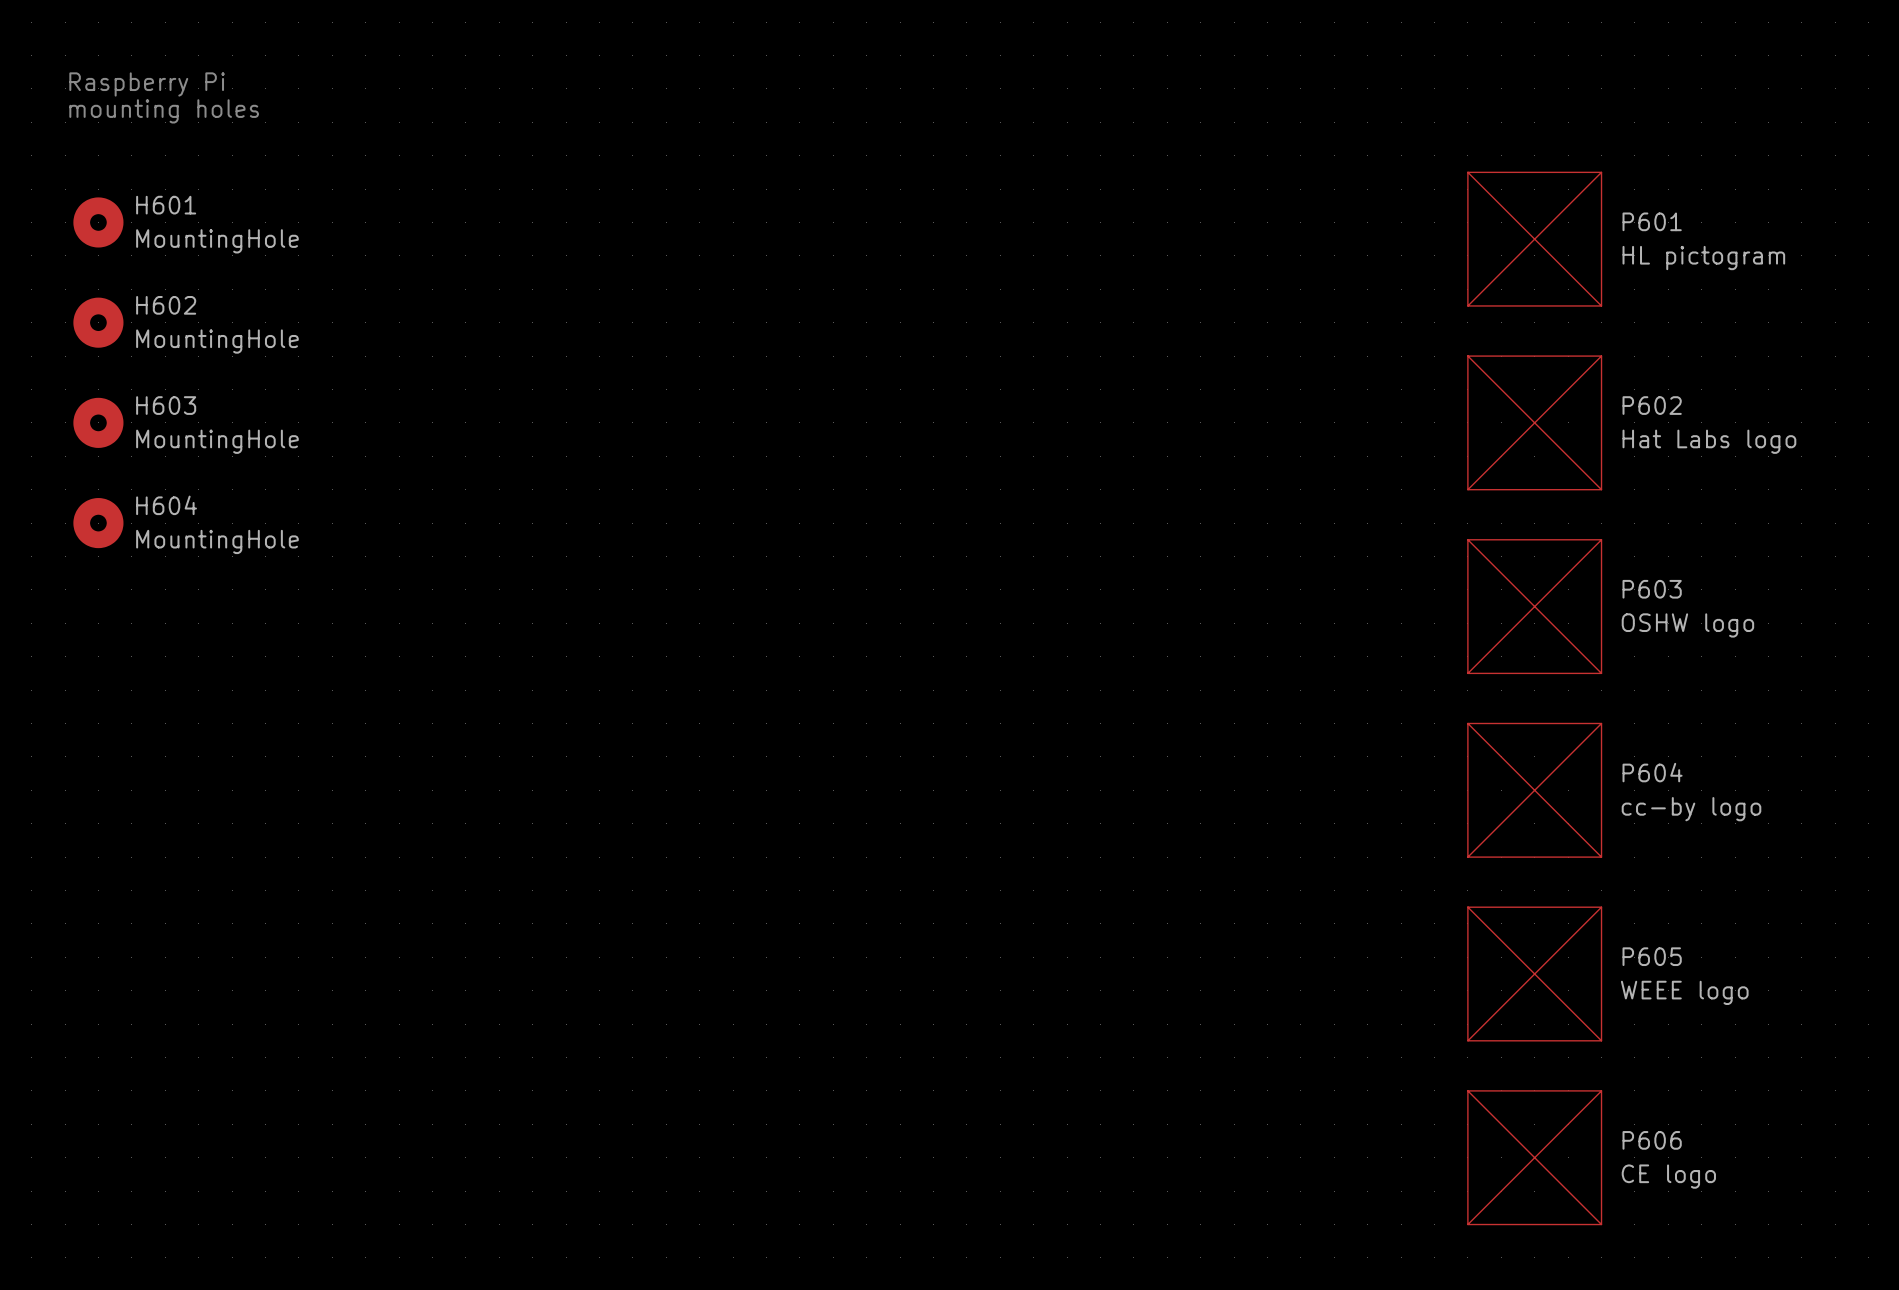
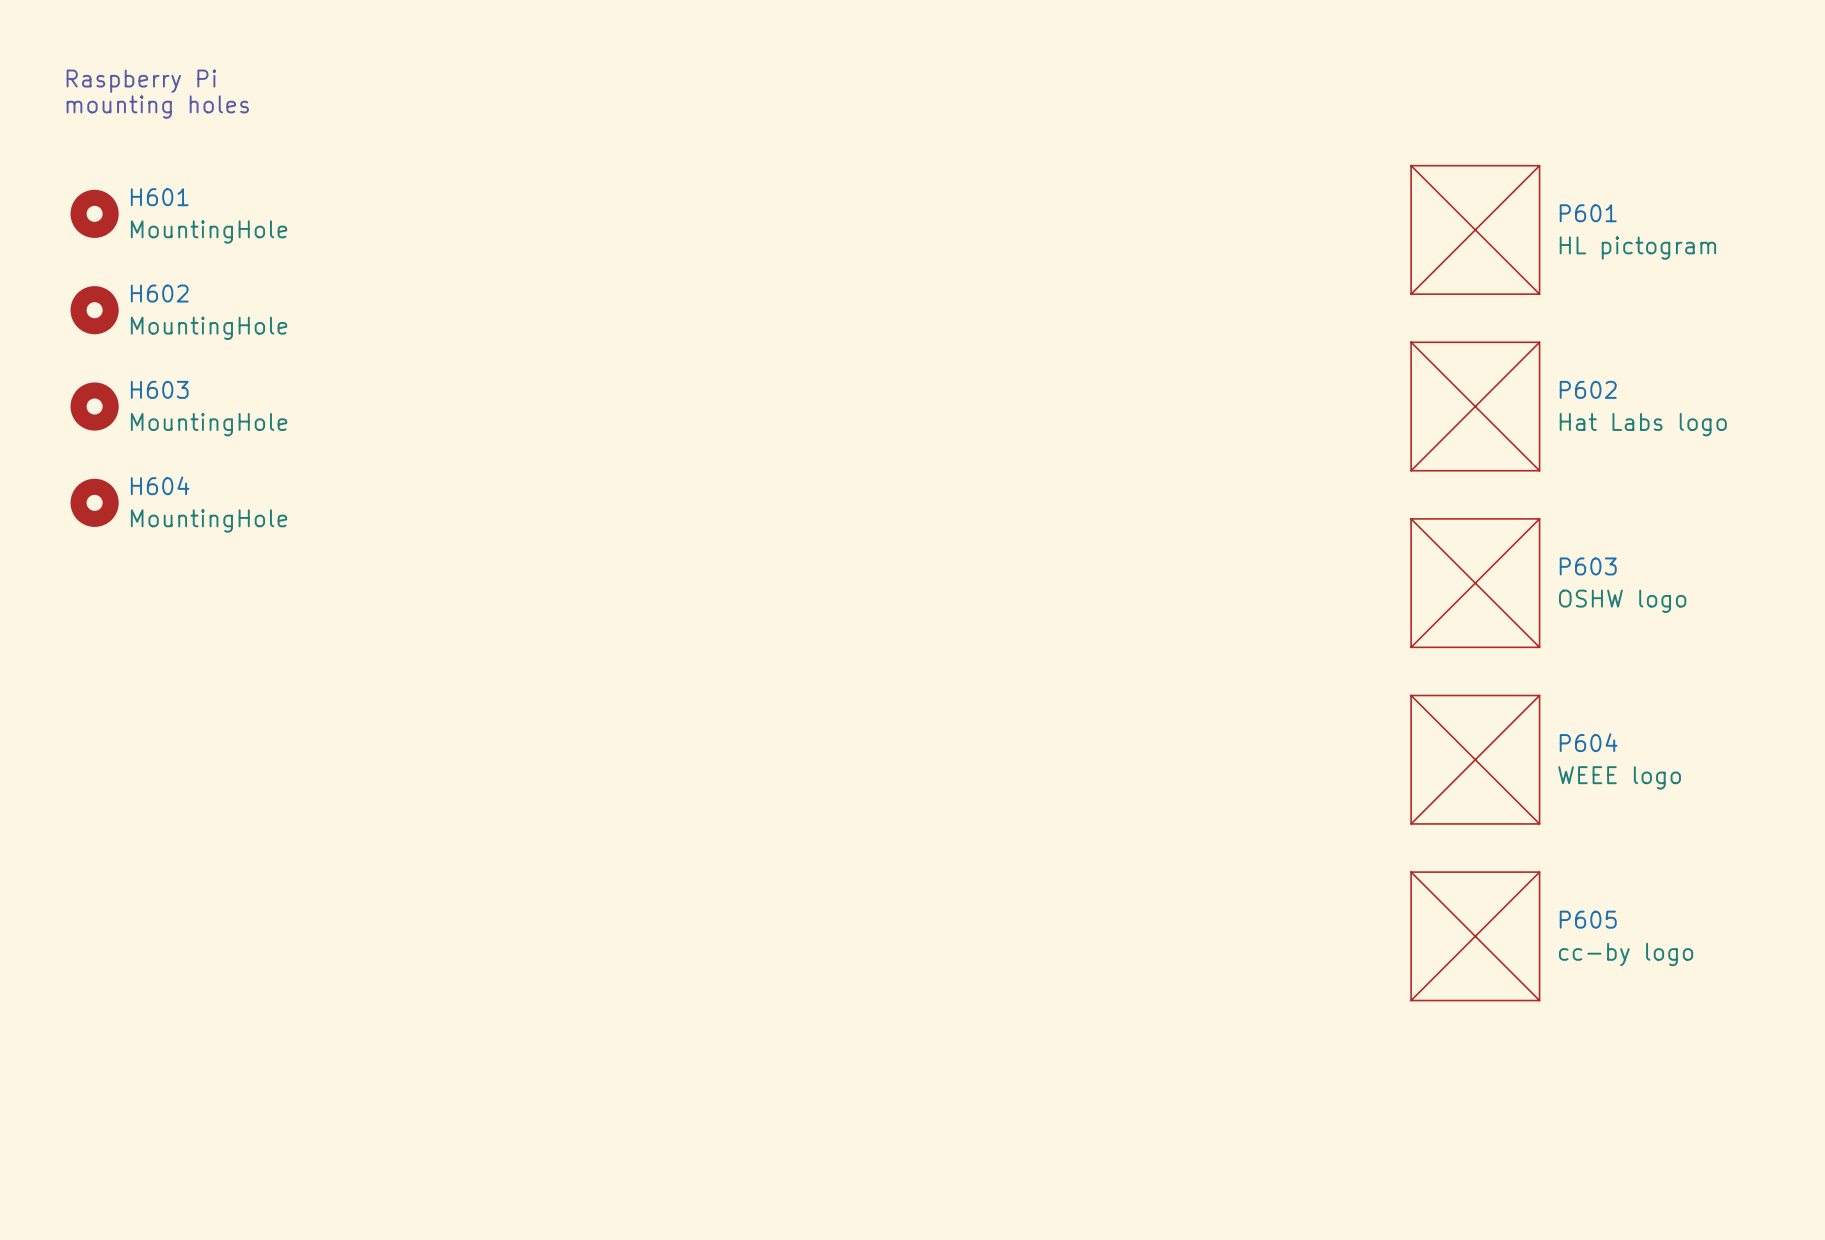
P604 value: cc-by logo (1691, 809) -> WEEE logo (1619, 777)
P605 value: WEEE logo (1684, 992) -> cc-by logo (1626, 954)
P606: CE logo (1534, 1157) -> none

